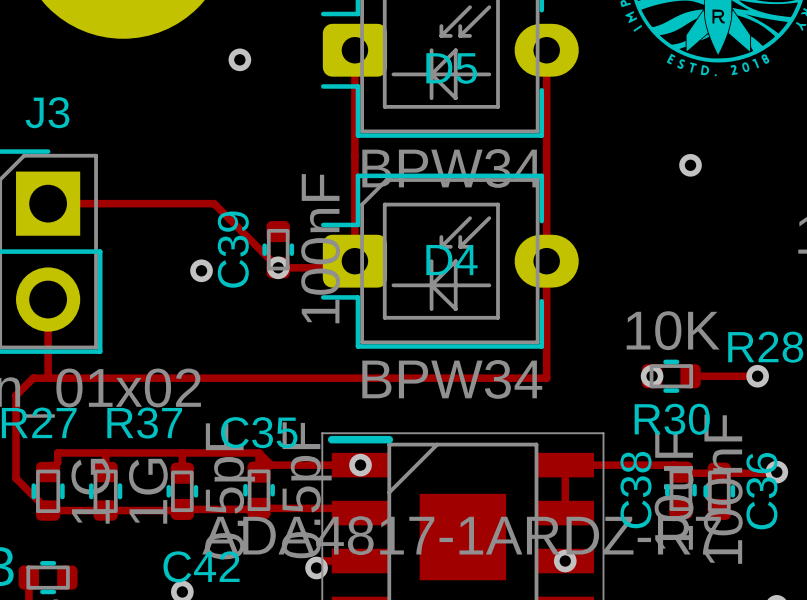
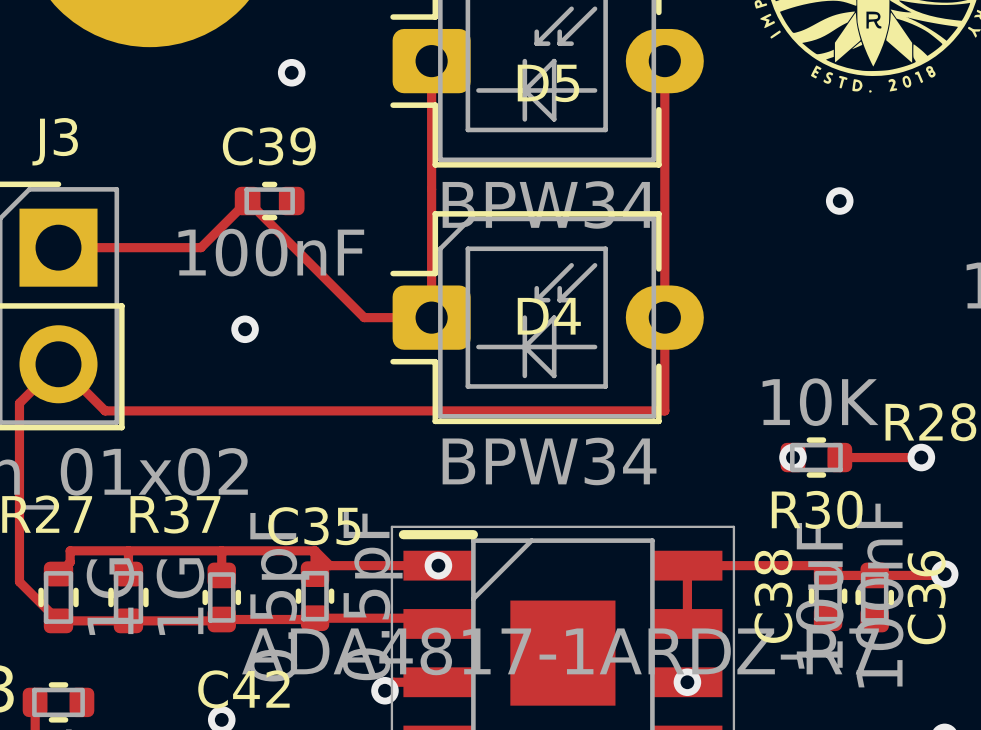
track: (165, 203) (214, 203) (278, 267) (348, 267) (354, 261) -> (200, 247) (247, 201) (364, 317) (431, 317)
C39 rotation: 0° (278, 249) -> 90° clockwise (269, 201)
C39 position: (278, 249) -> (269, 201)
via: (278, 267) -> none
track: (48, 299) (48, 376) (50, 378) -> none
track: (546, 337) (546, 378) (33, 378) (16, 395) -> (664, 410) (105, 410) (58, 364) (19, 403) (19, 480)

